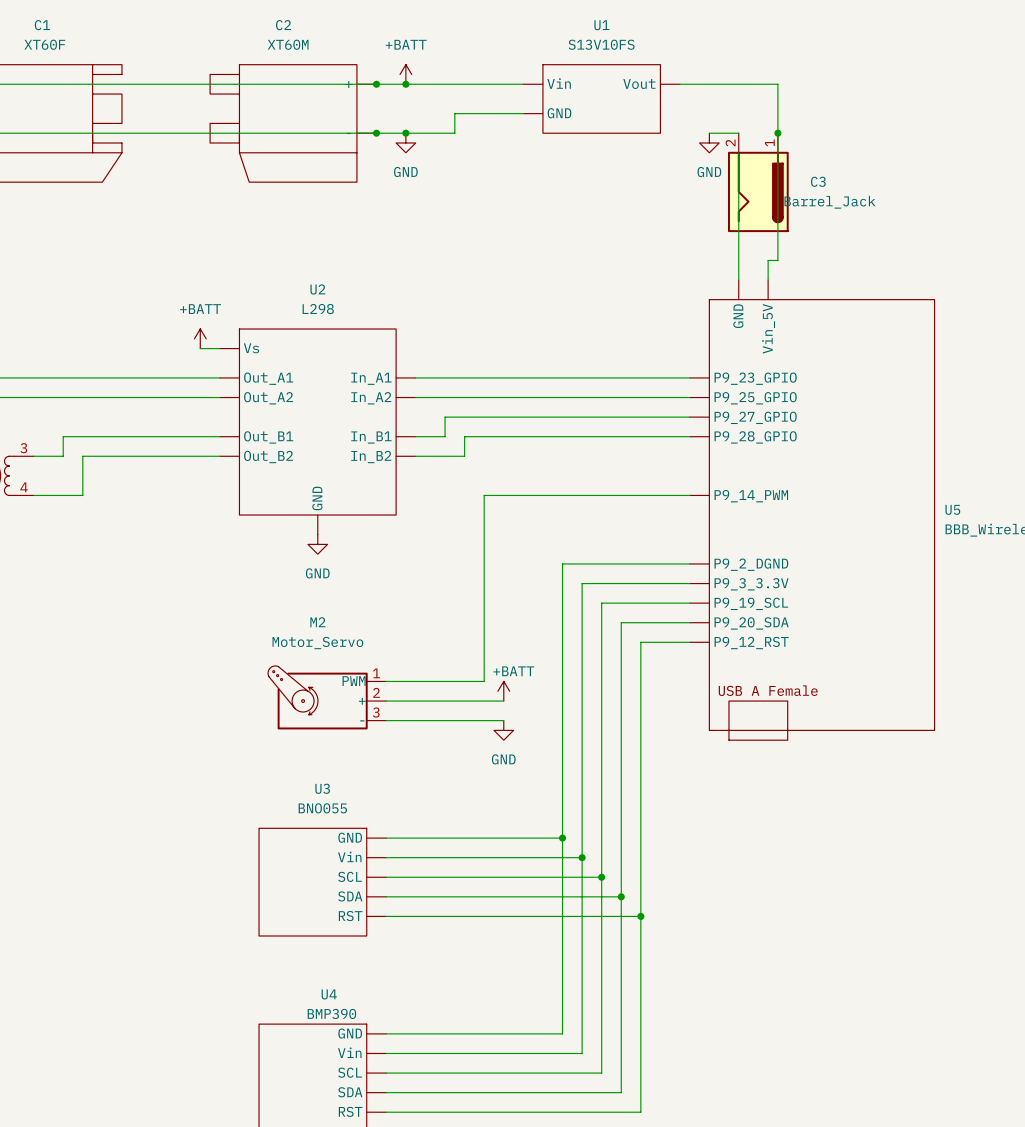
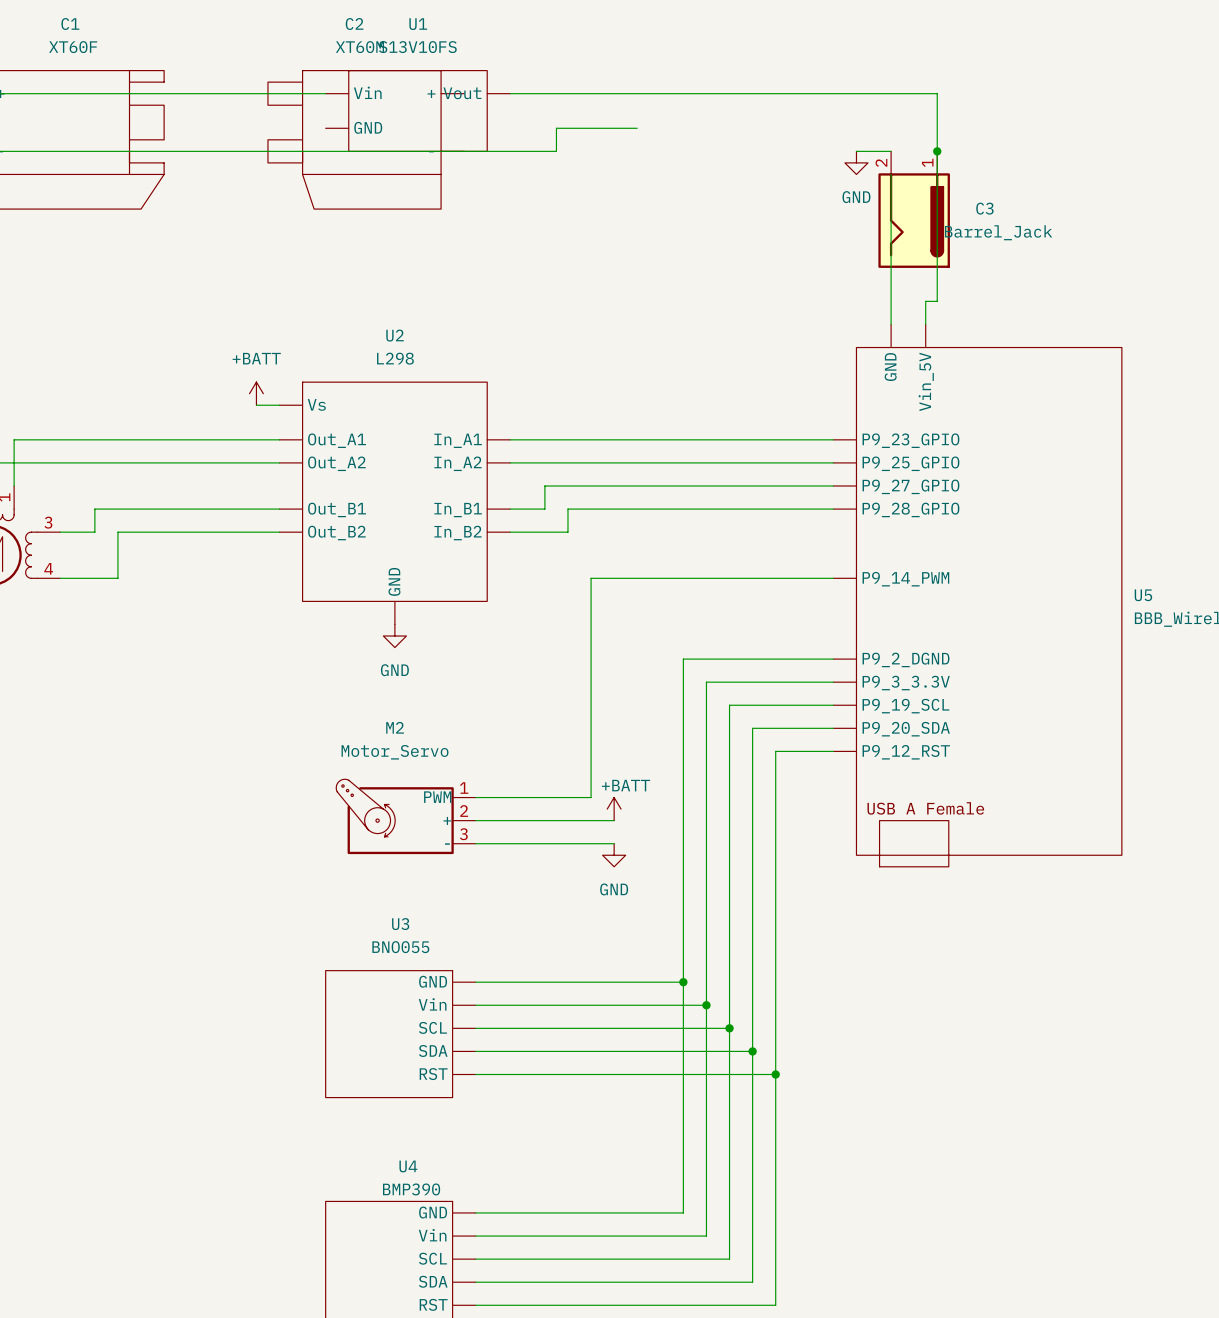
power symbol: +BATT (405, 74) -> none
wire: (259, 84) (415, 84) -> none
junction: (376, 84) -> none
junction: (405, 84) -> none
wire: none -> (637, 93) (821, 93)
U1 position: (601, 98) -> (417, 110)
junction: (376, 133) -> none
junction: (405, 133) -> none
power symbol: GND (405, 142) -> none

